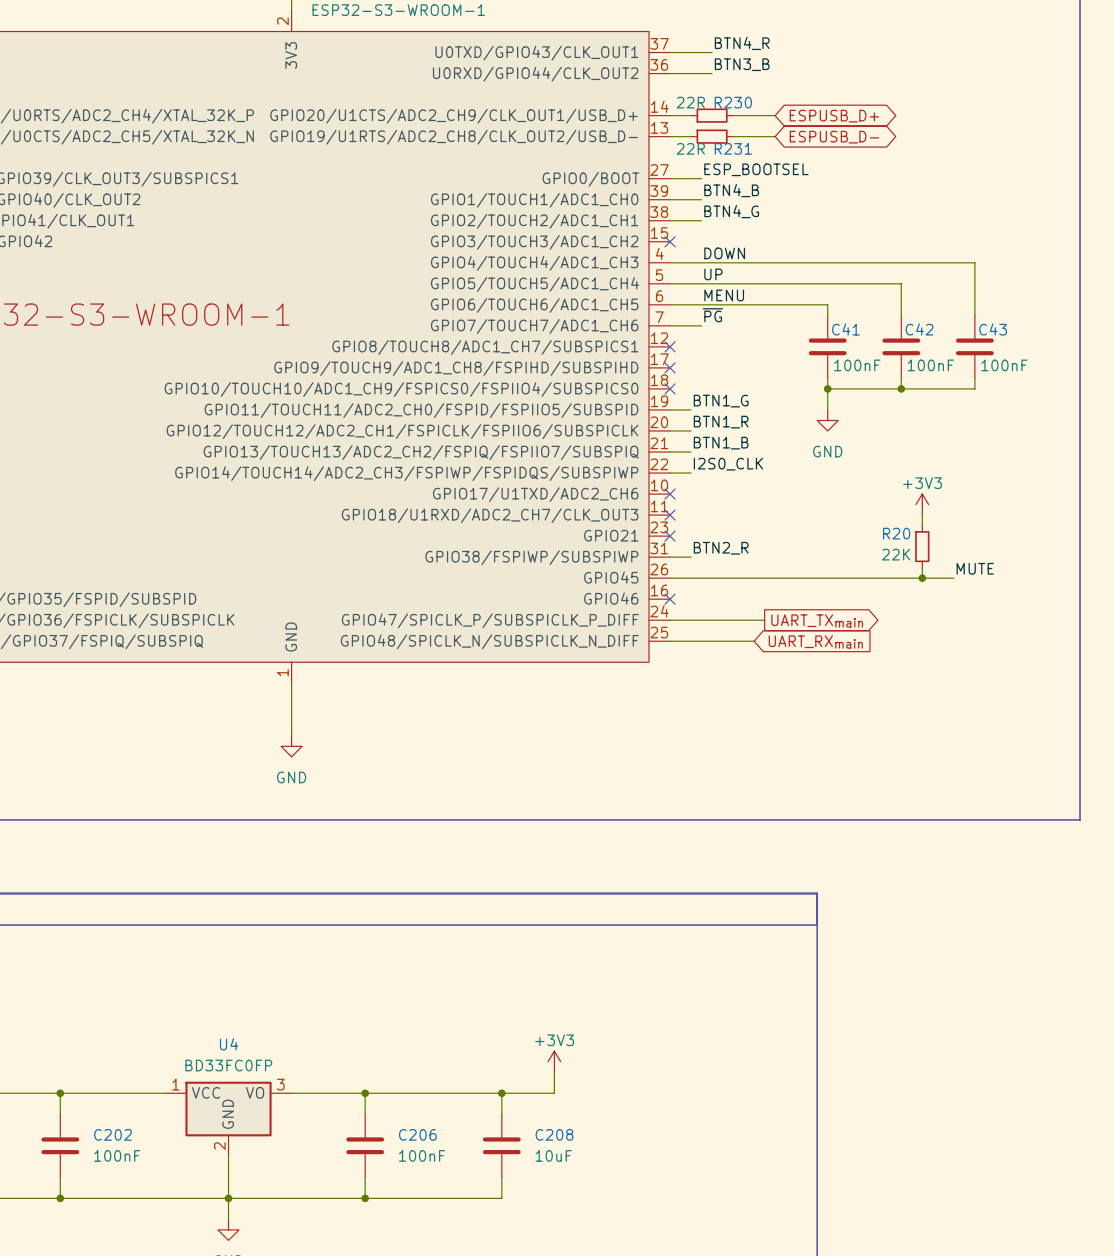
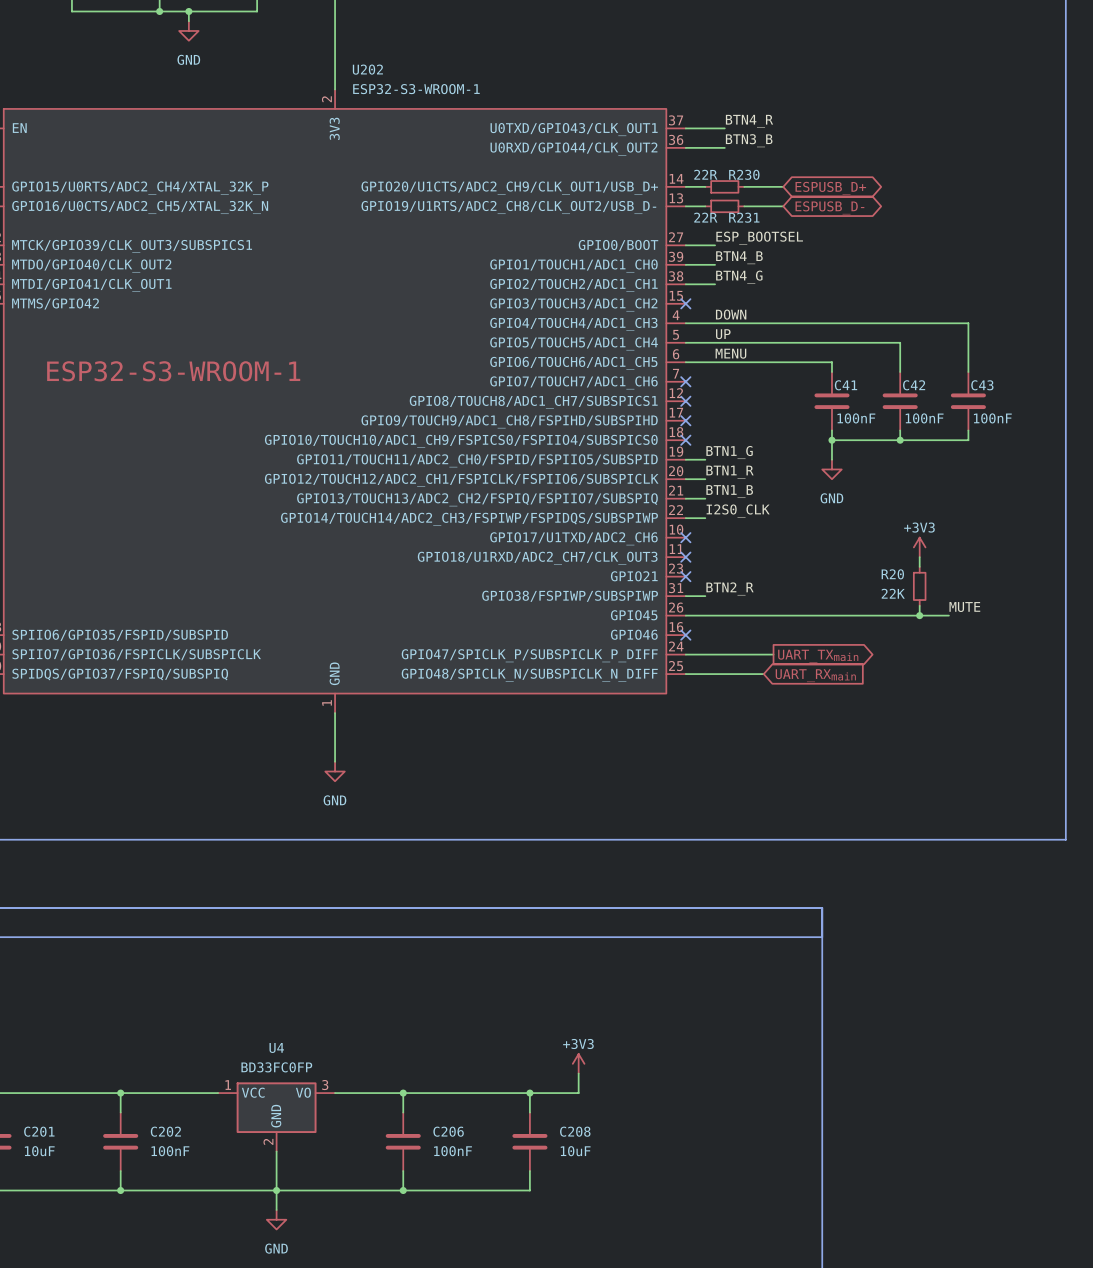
label: ~{PG} (712, 315) -> none
wire: (670, 325) (701, 325) -> none
no-connect mark: none -> (685, 381)

